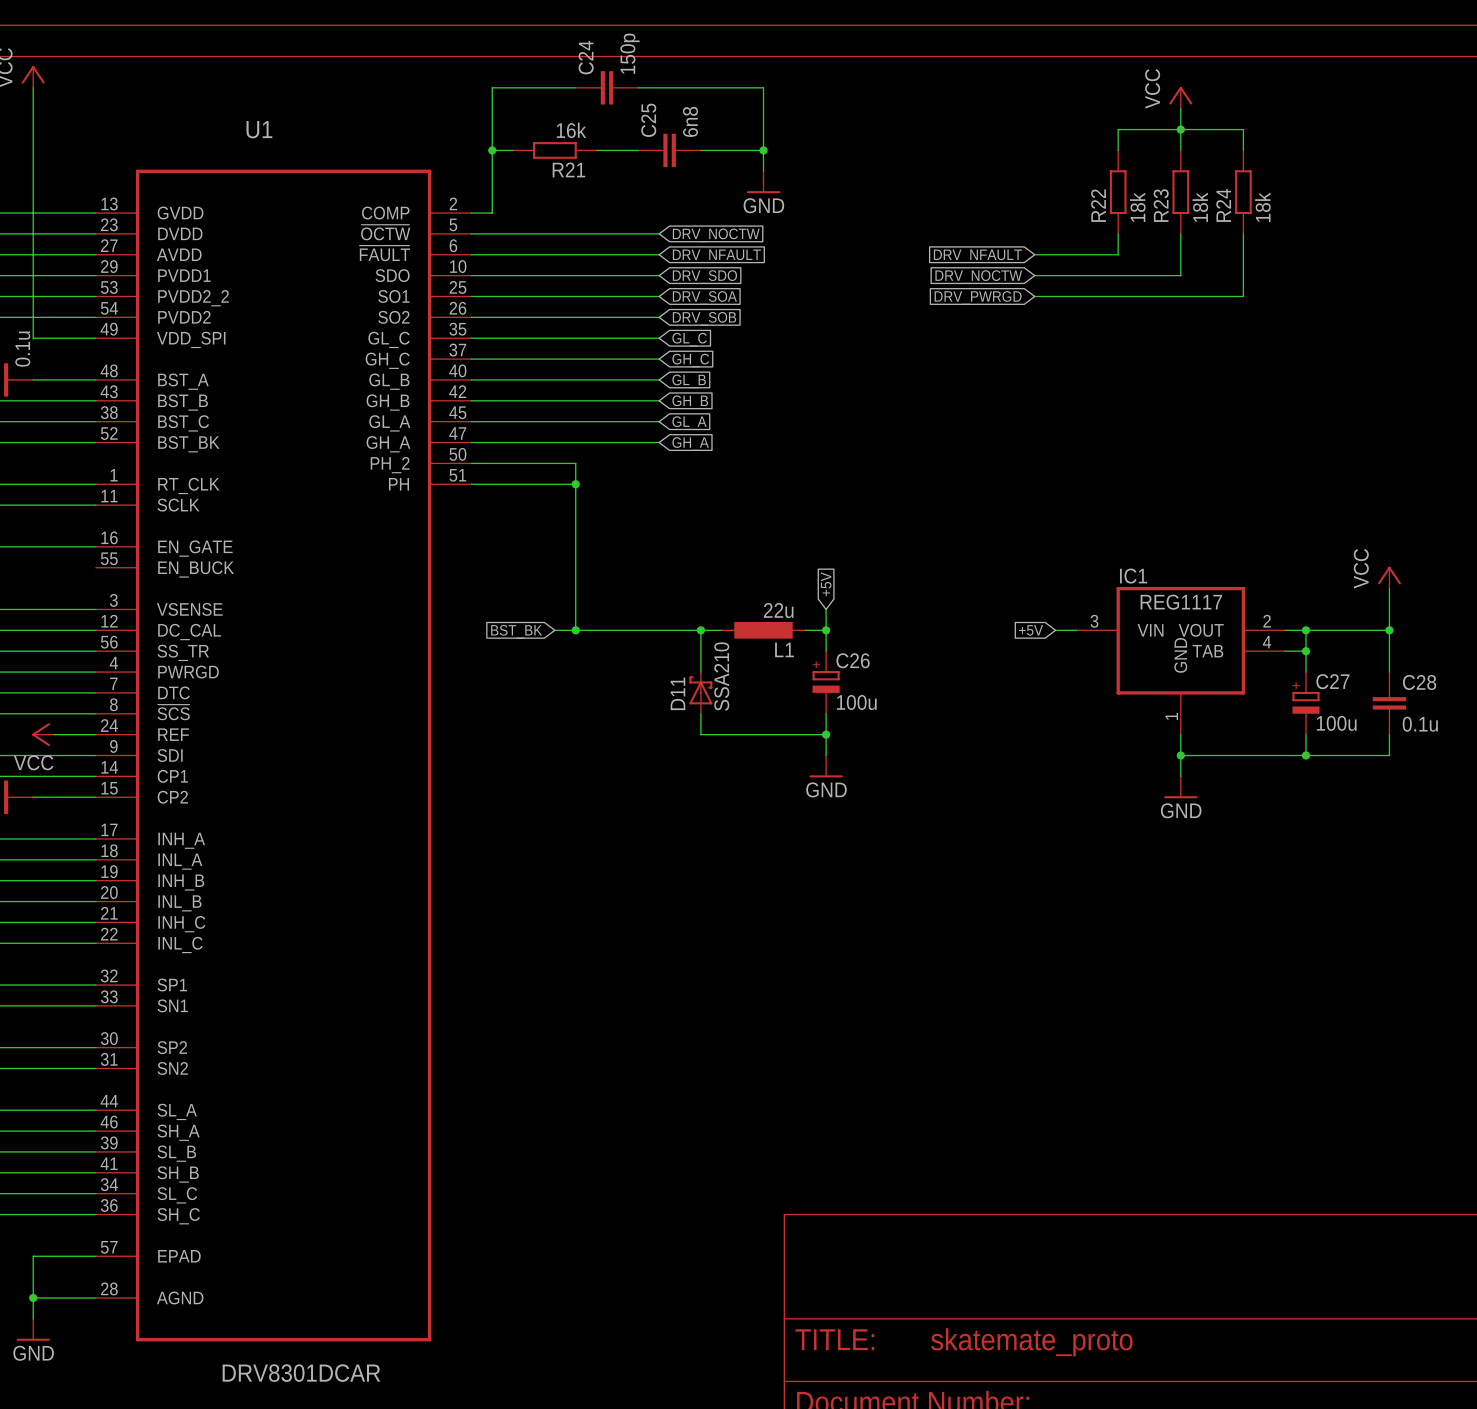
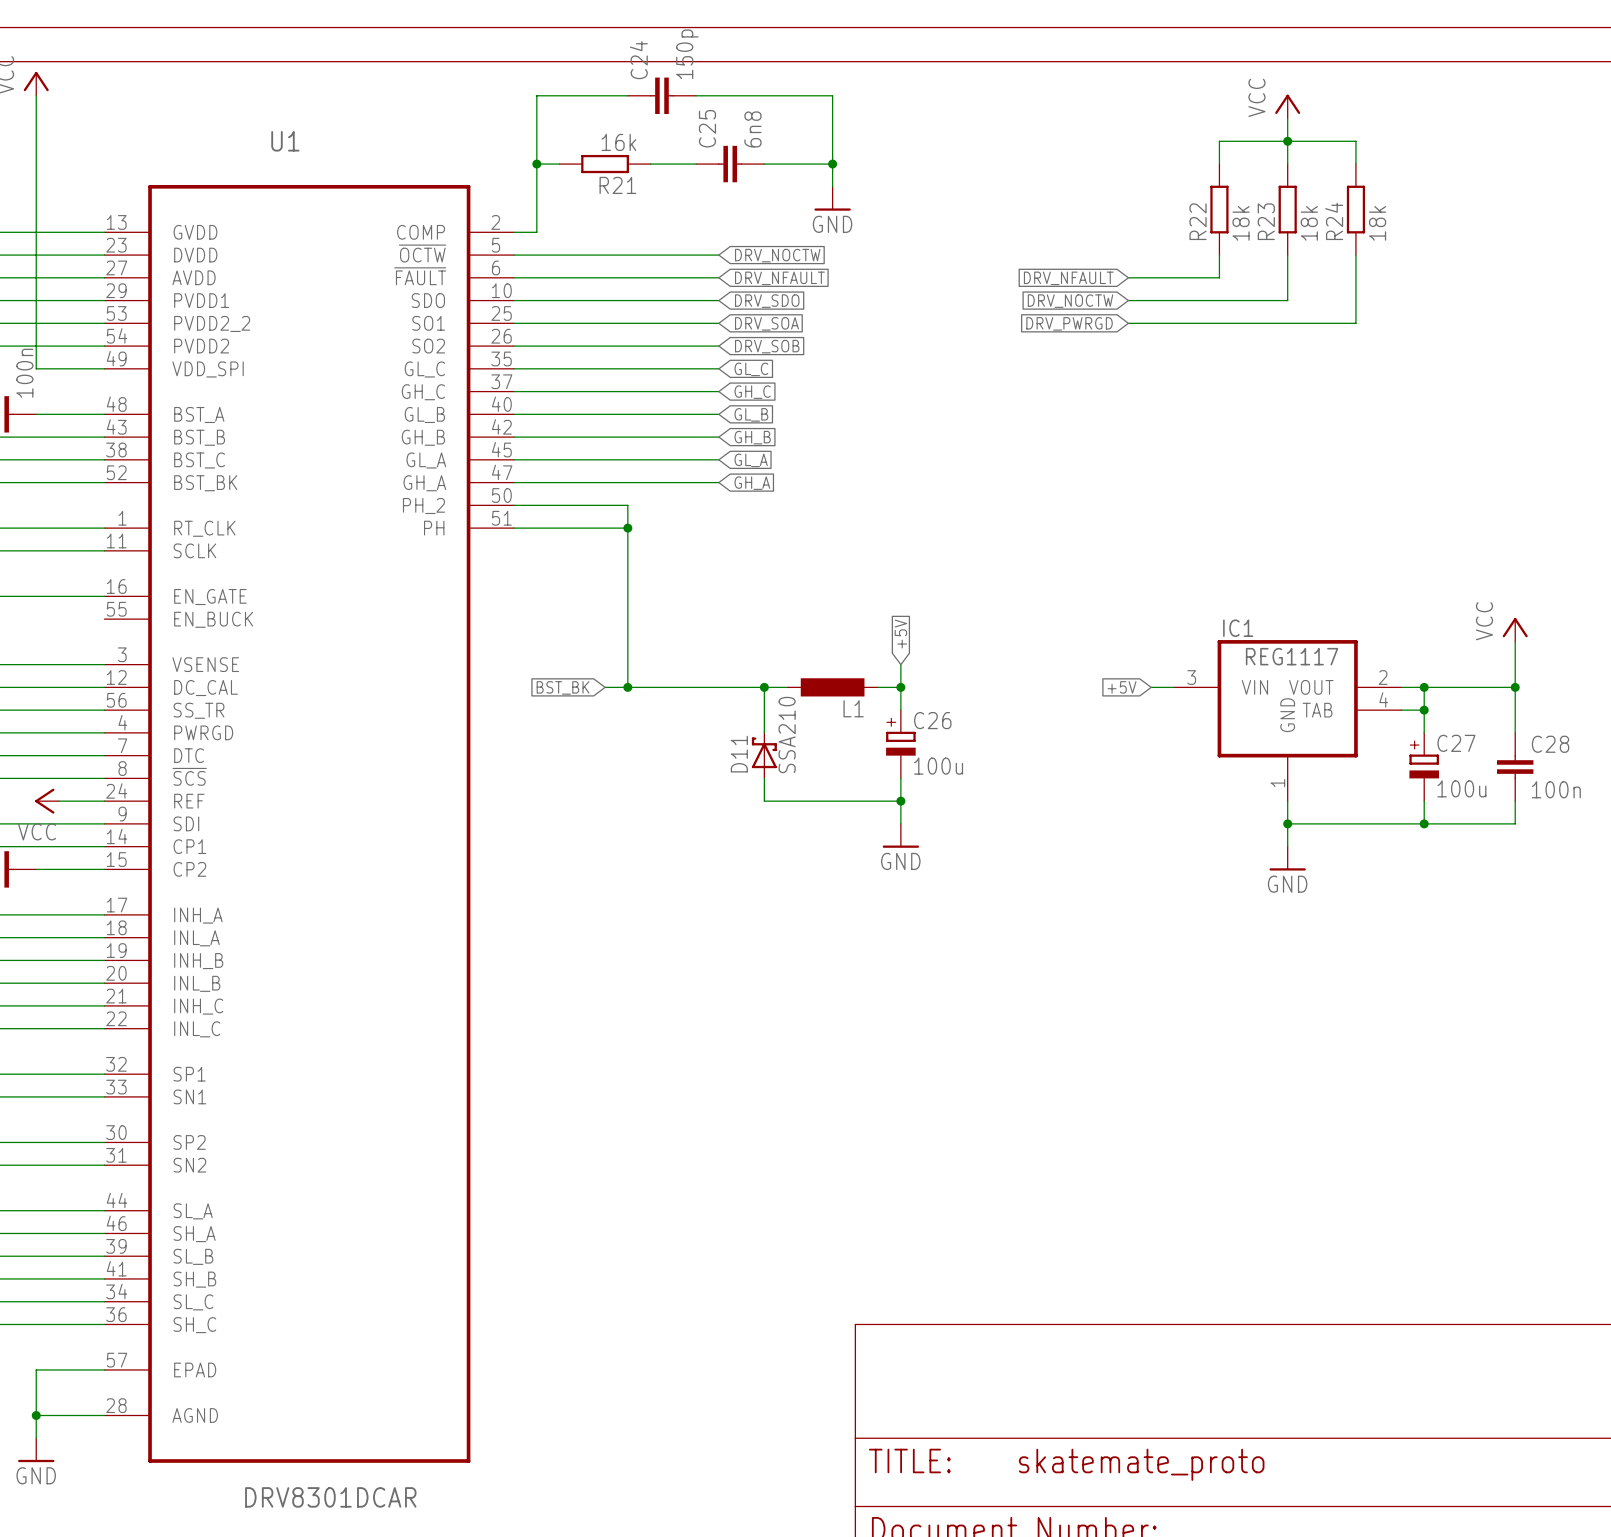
part value: 0.1u (22, 349) -> 100n (24, 373)
L1 value: 22u (778, 610) -> none
C28 value: 0.1u (1420, 724) -> 100n (1556, 789)

